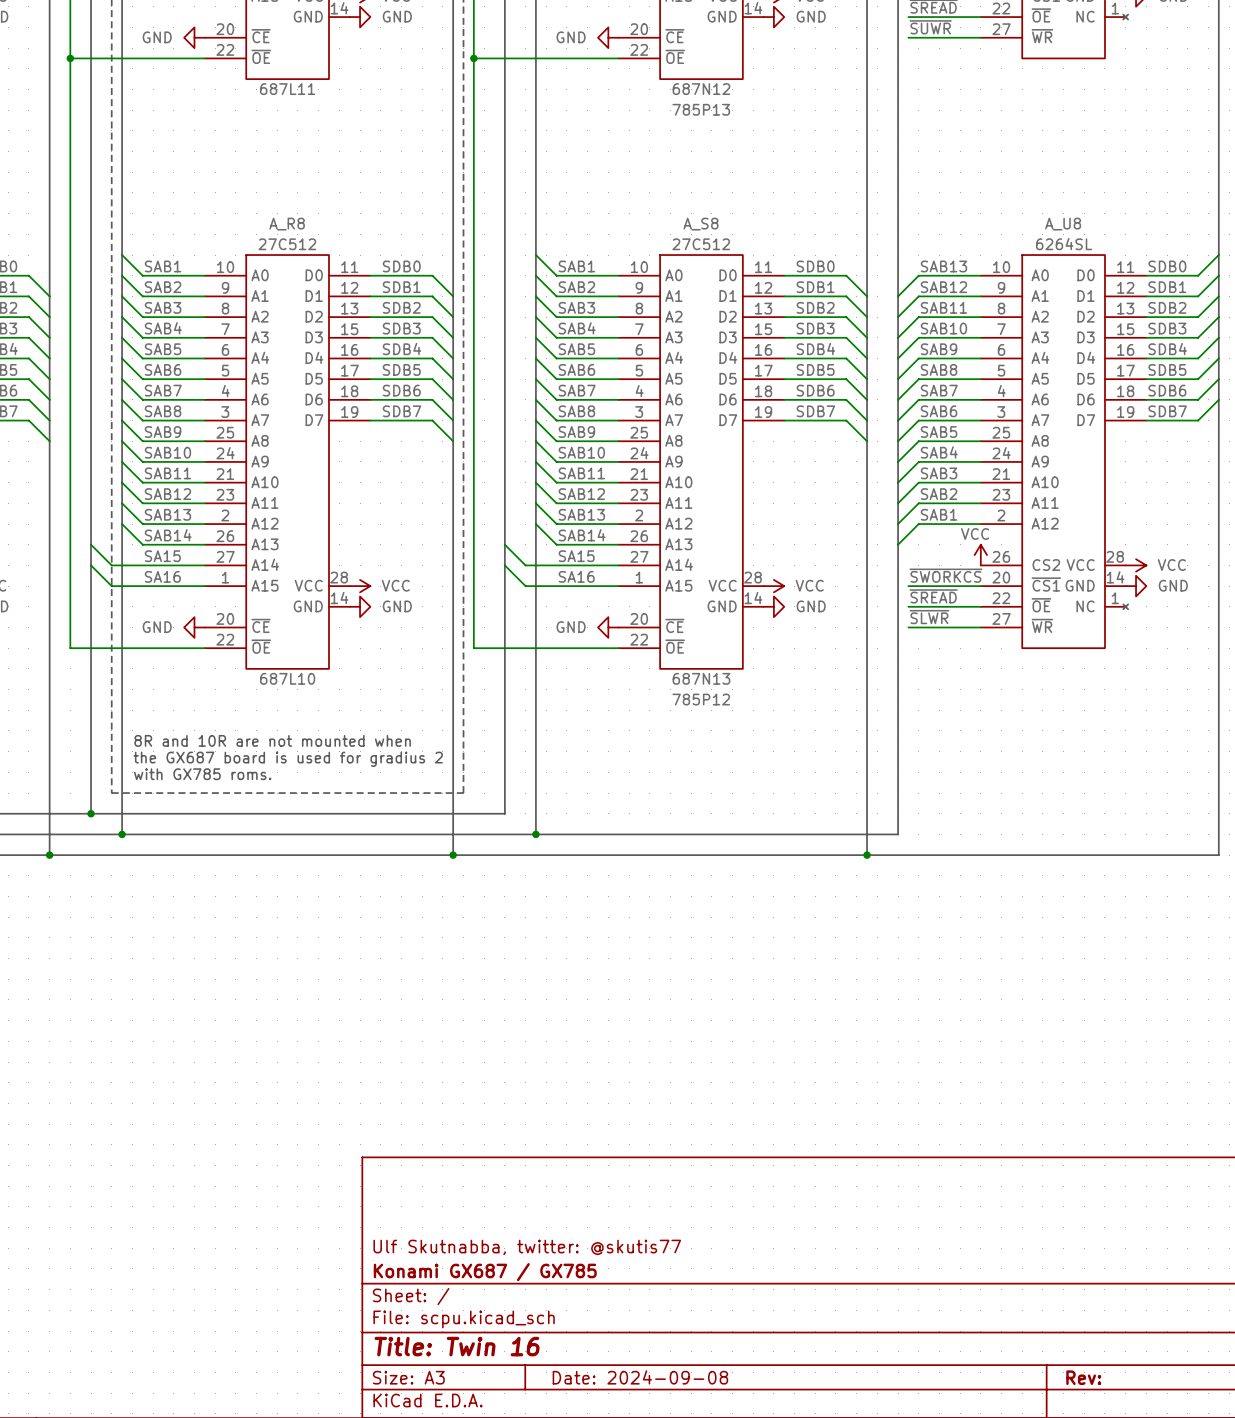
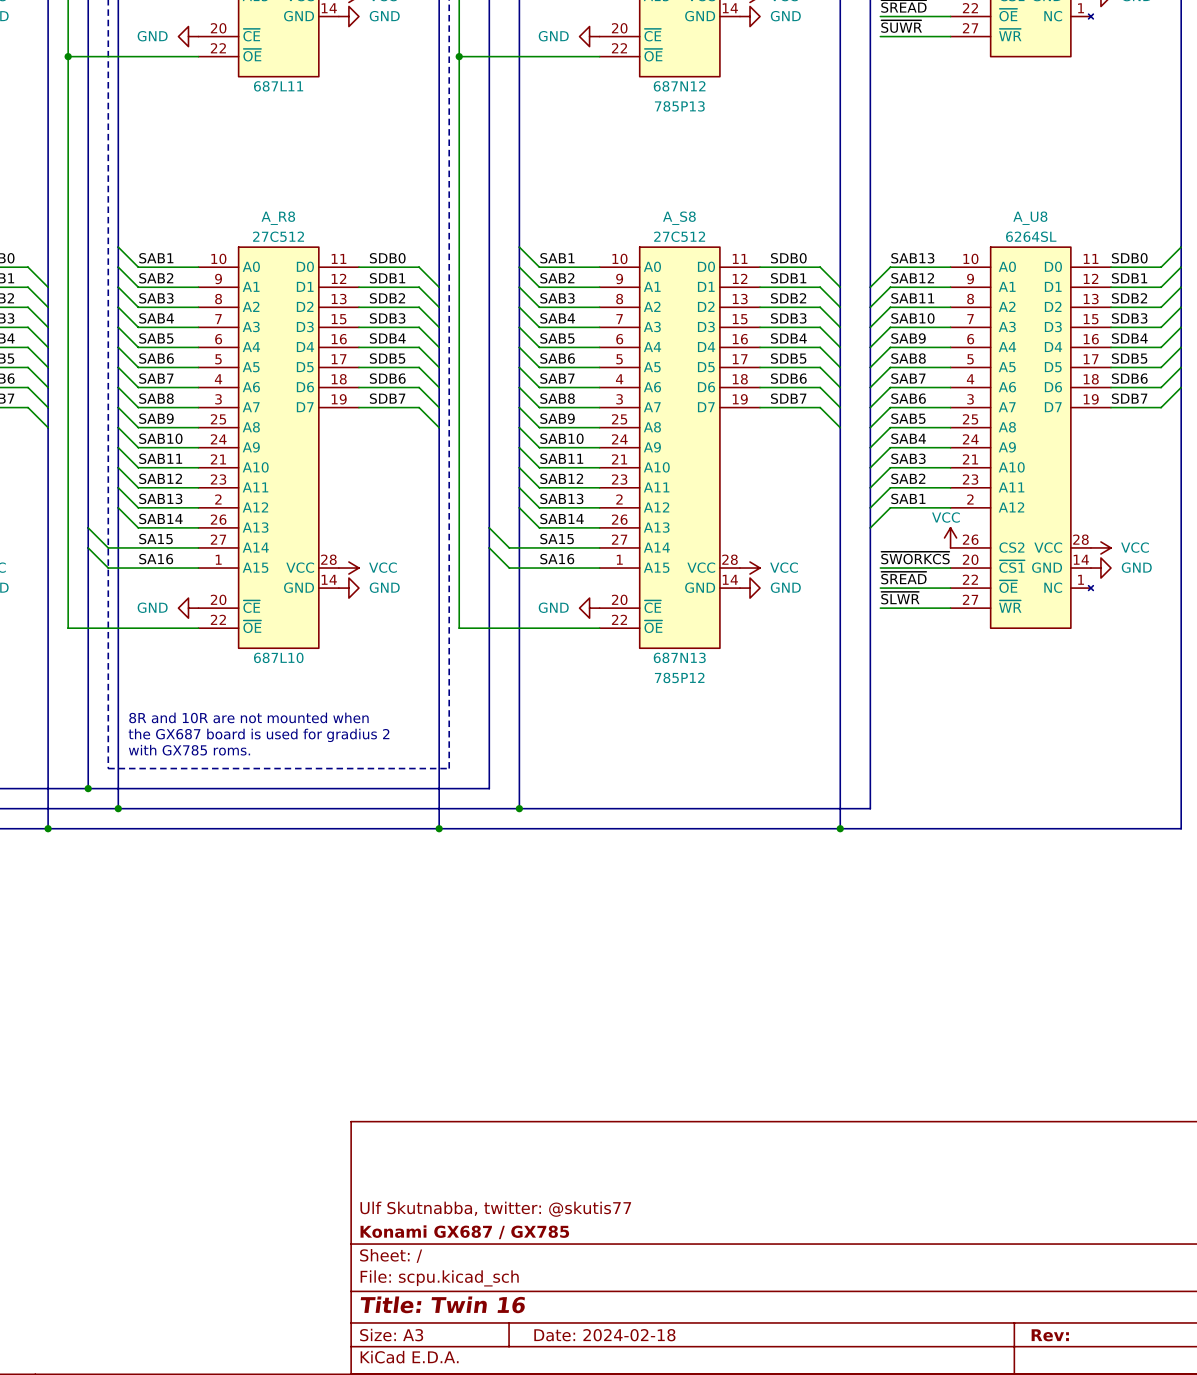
title block: Date: 2024-09-08 (640, 1377) -> Date: 2024-02-18 (604, 1335)

